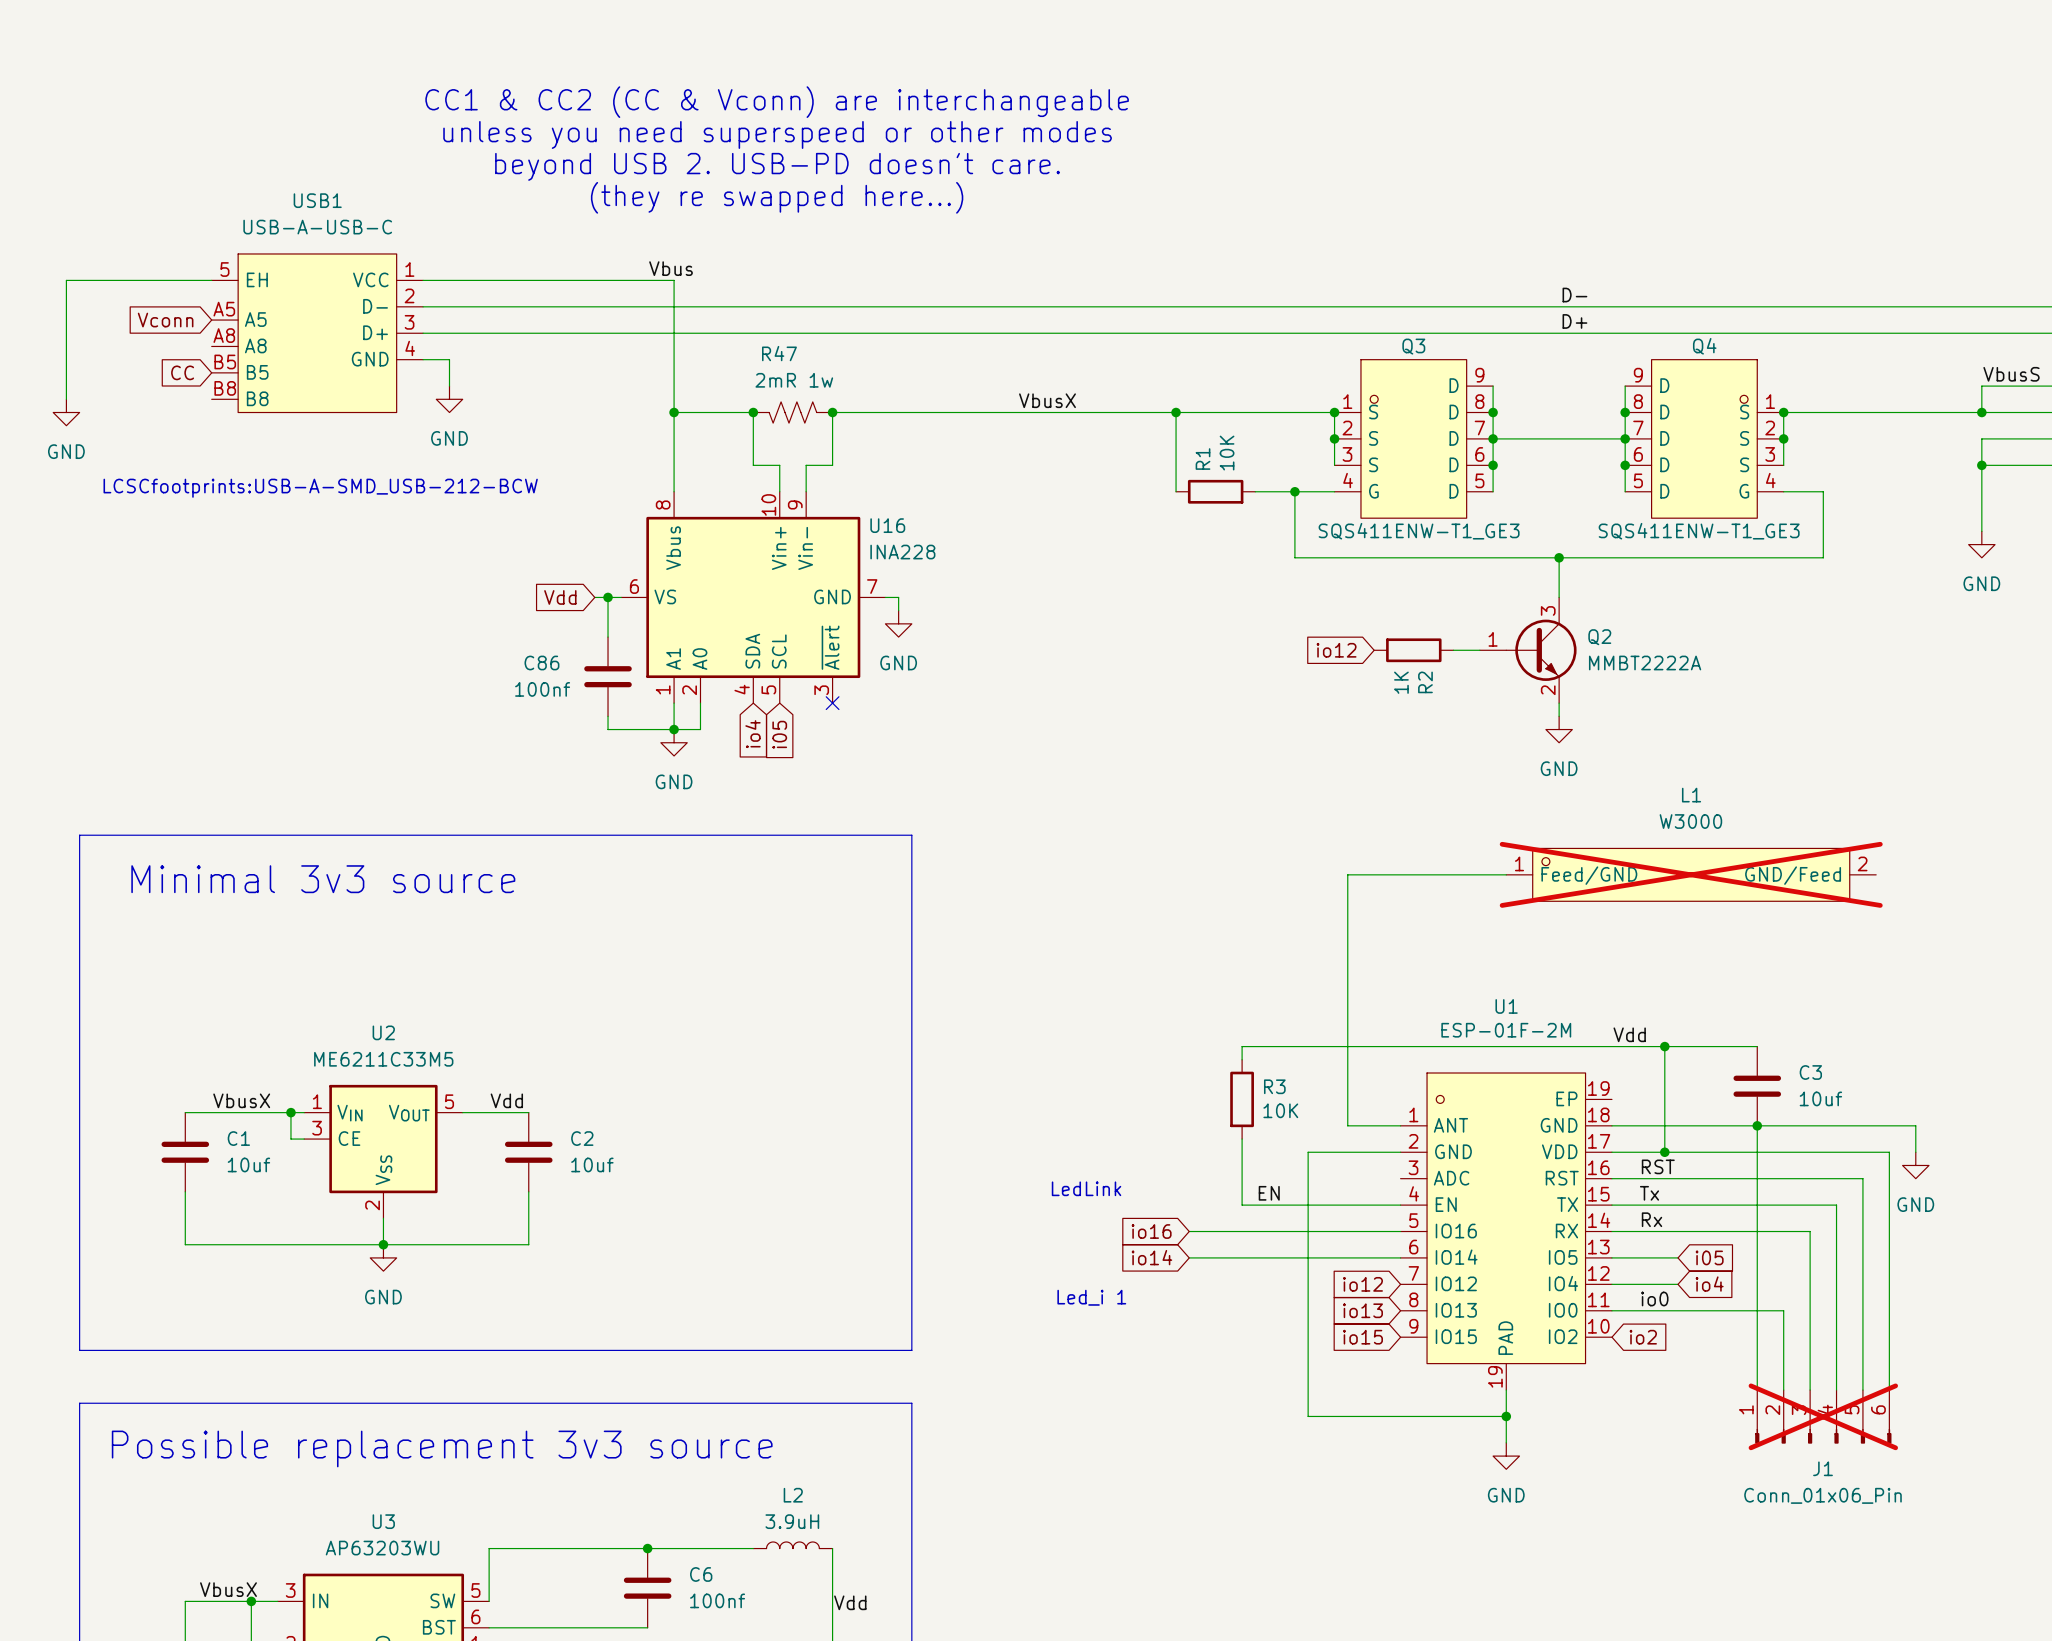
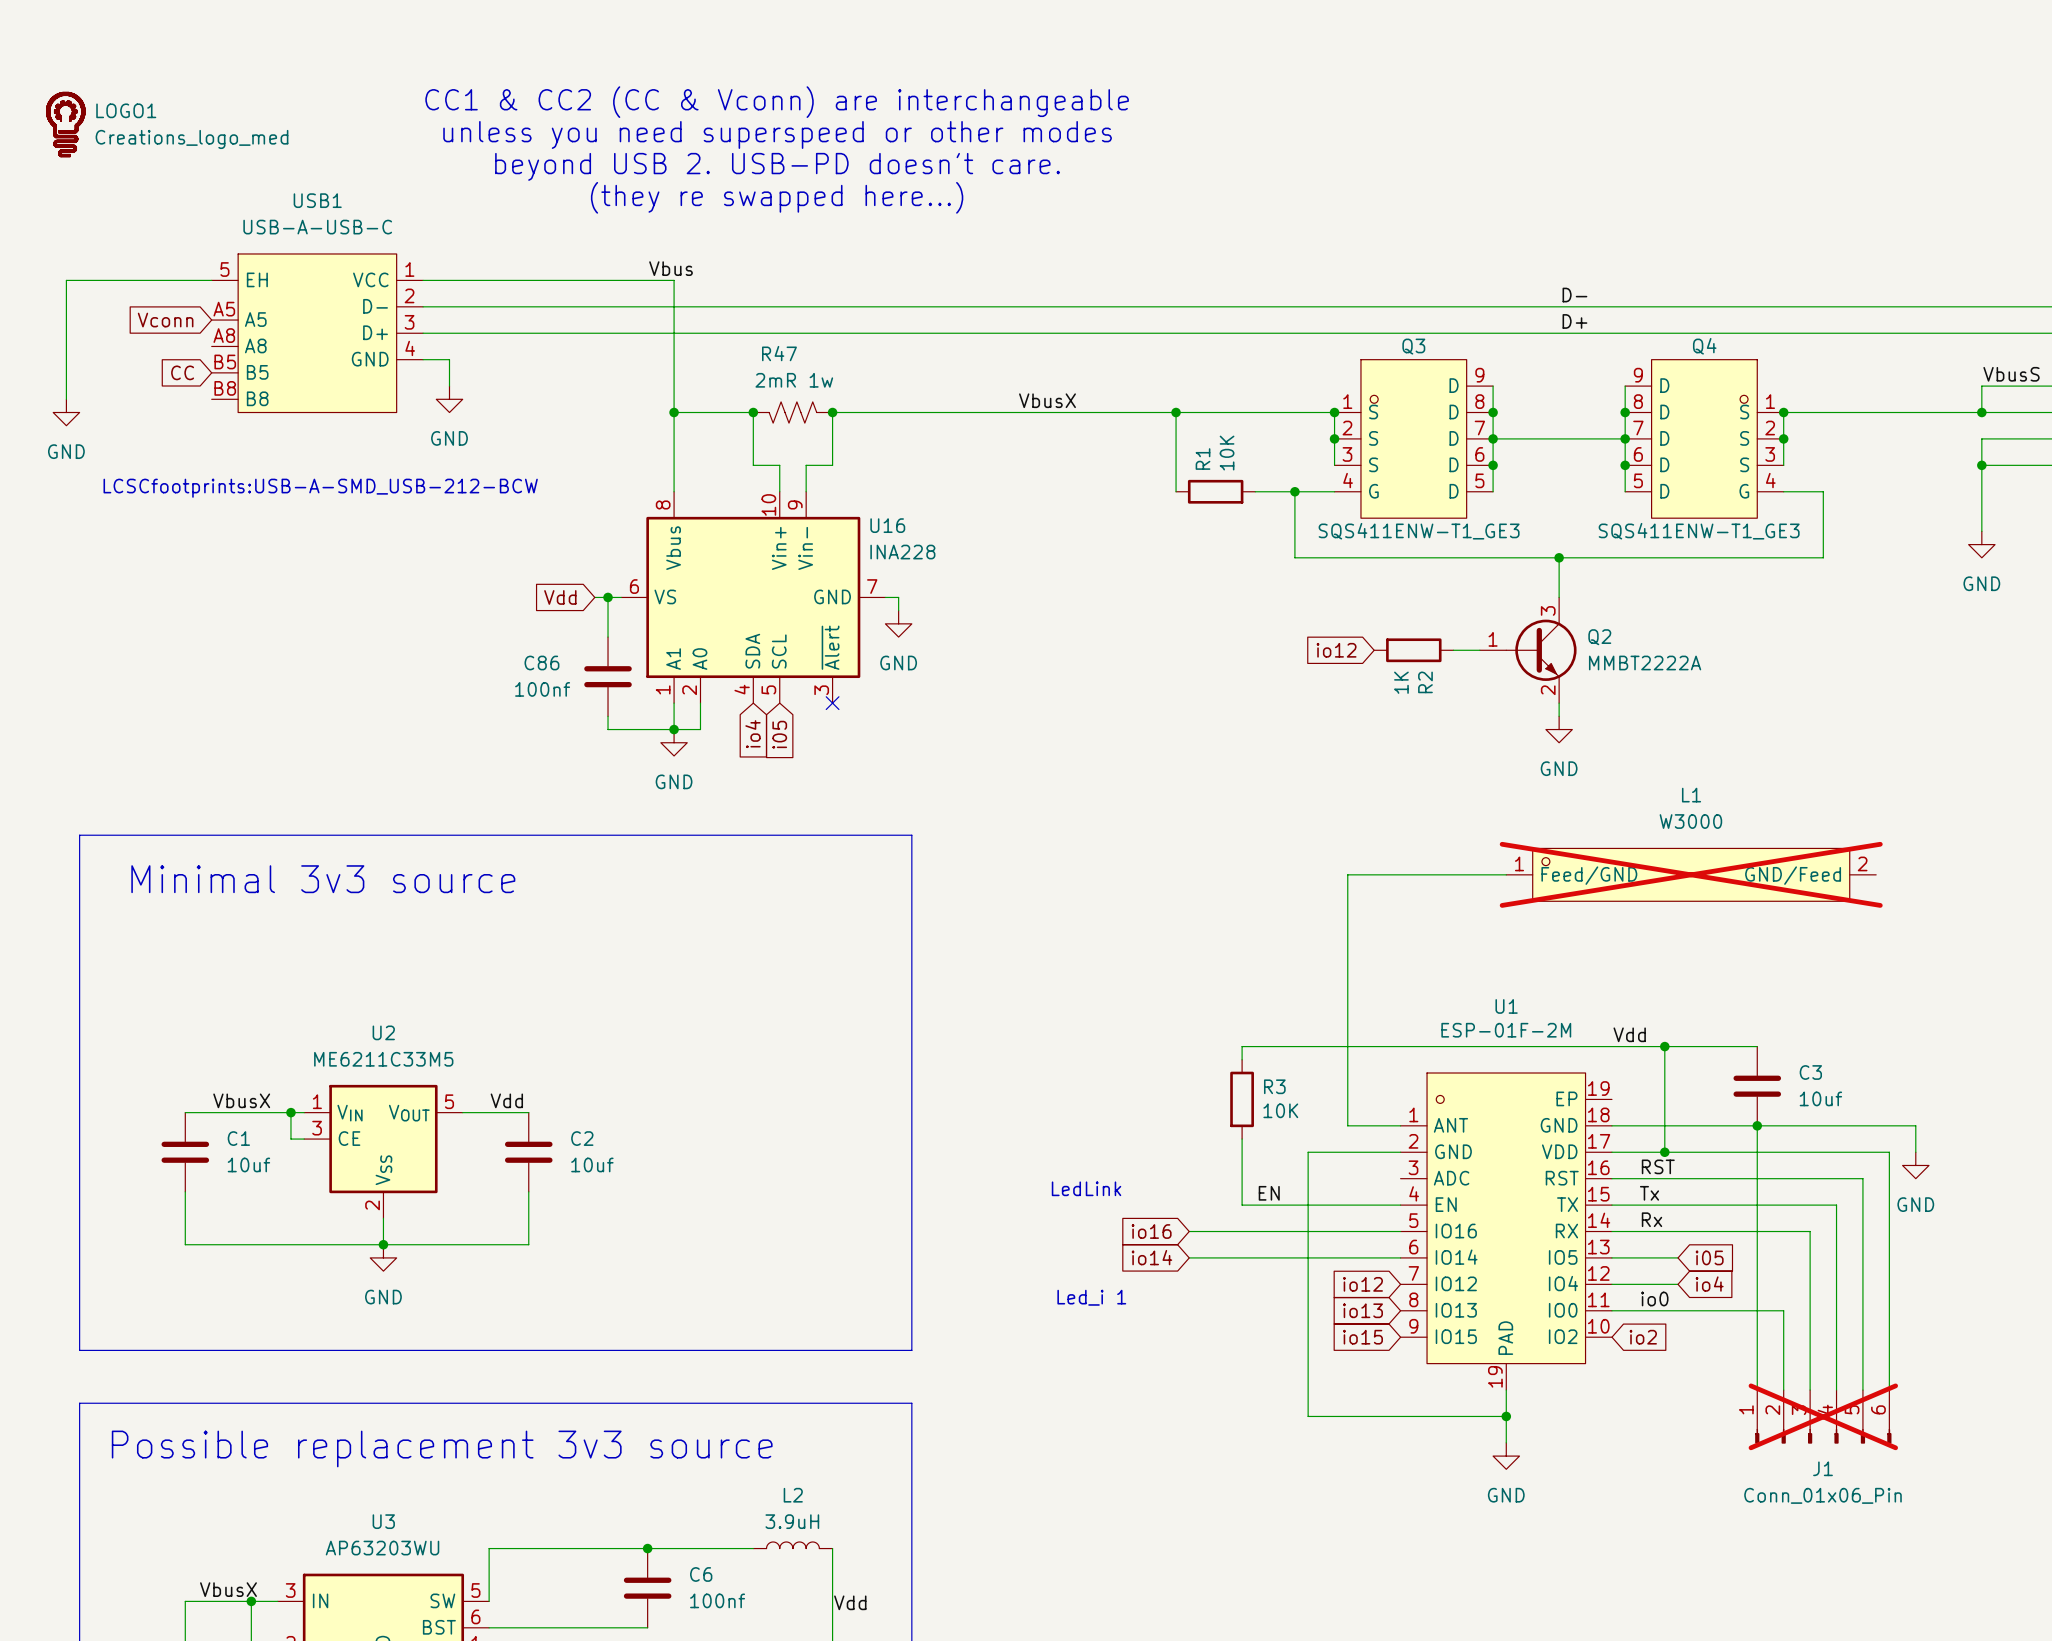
LOGO1: none -> Creations_logo_med (65, 124)

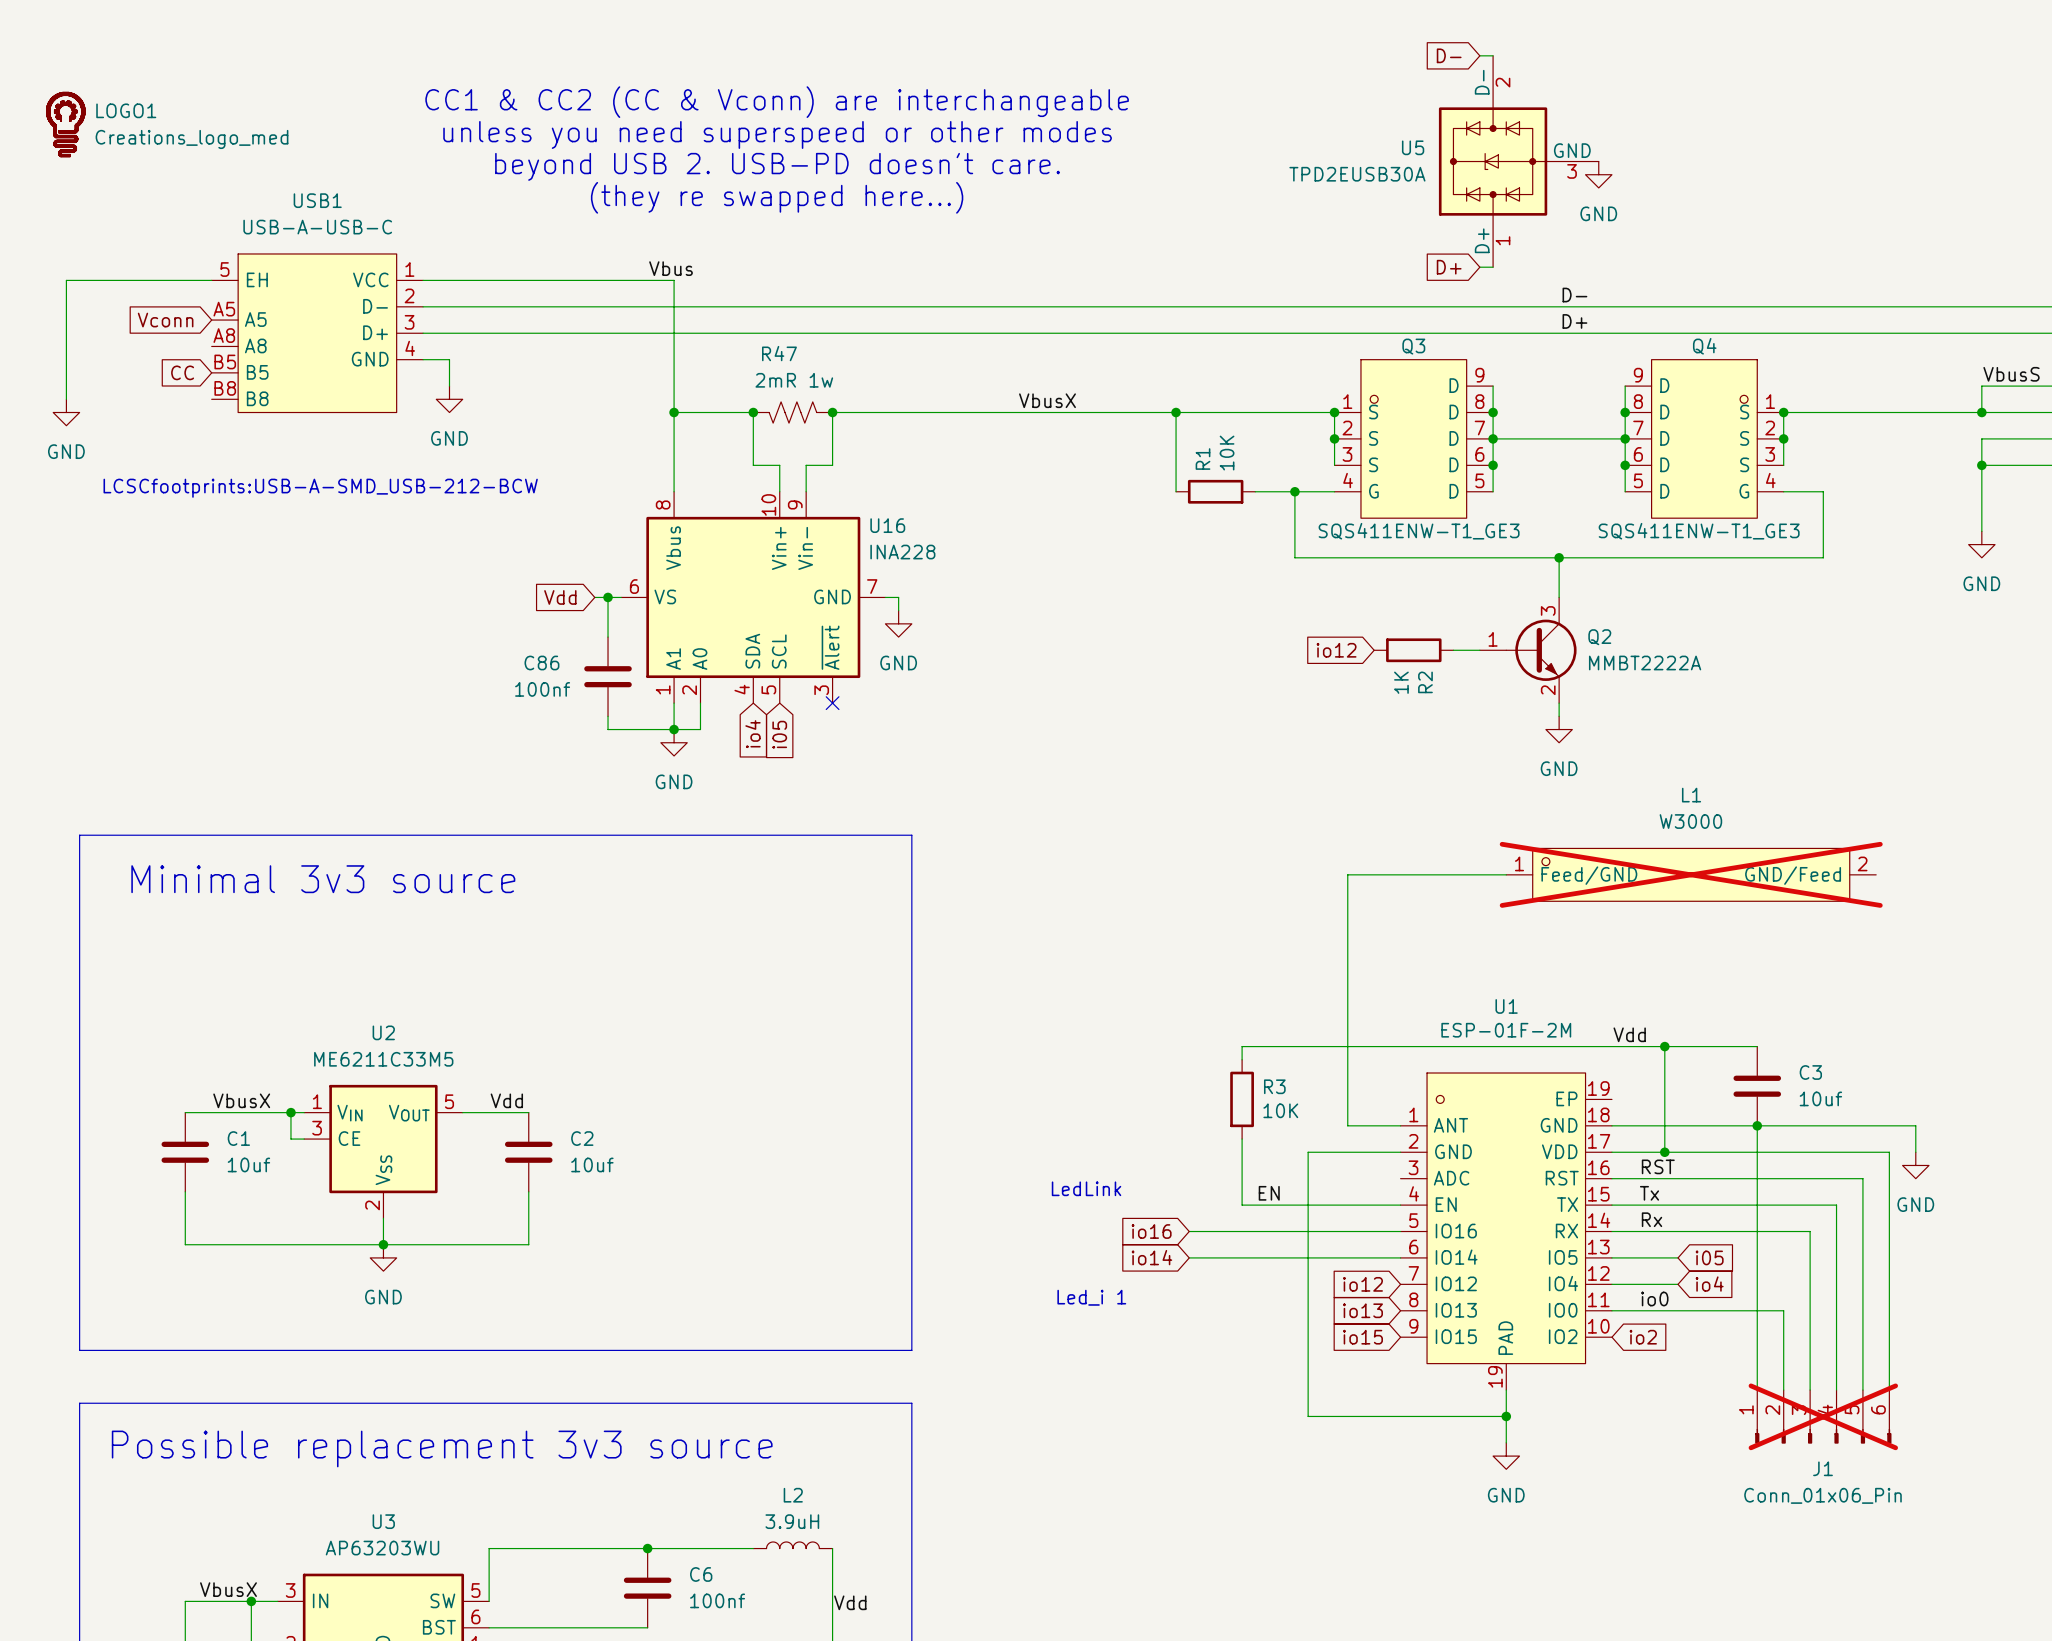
global label: none -> D- (1449, 55)
wire: none -> (1479, 55) (1493, 55)
U5: none -> TPD2EUSB30A (1518, 161)
power symbol: none -> GND (1598, 174)
global label: none -> D+ (1449, 267)
wire: none -> (1479, 267) (1493, 267)

